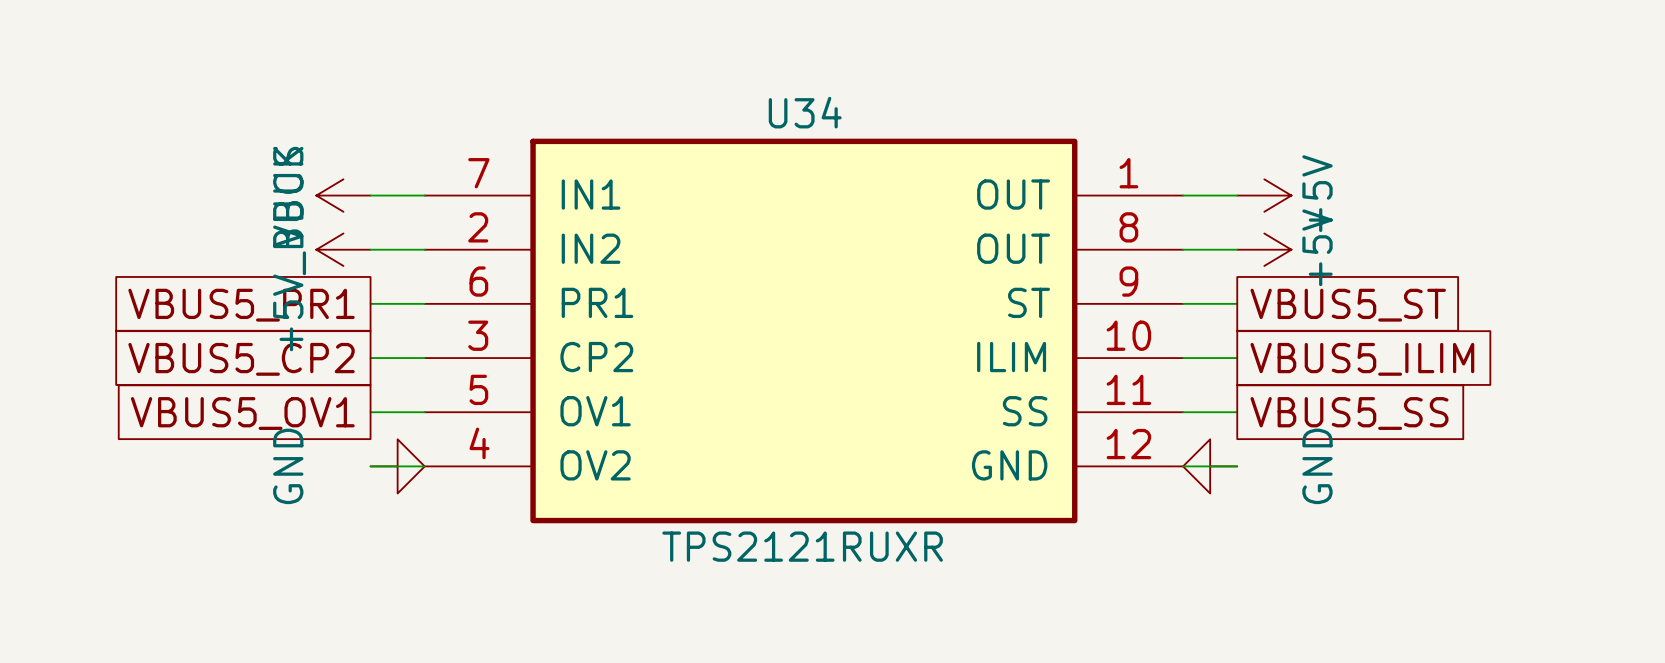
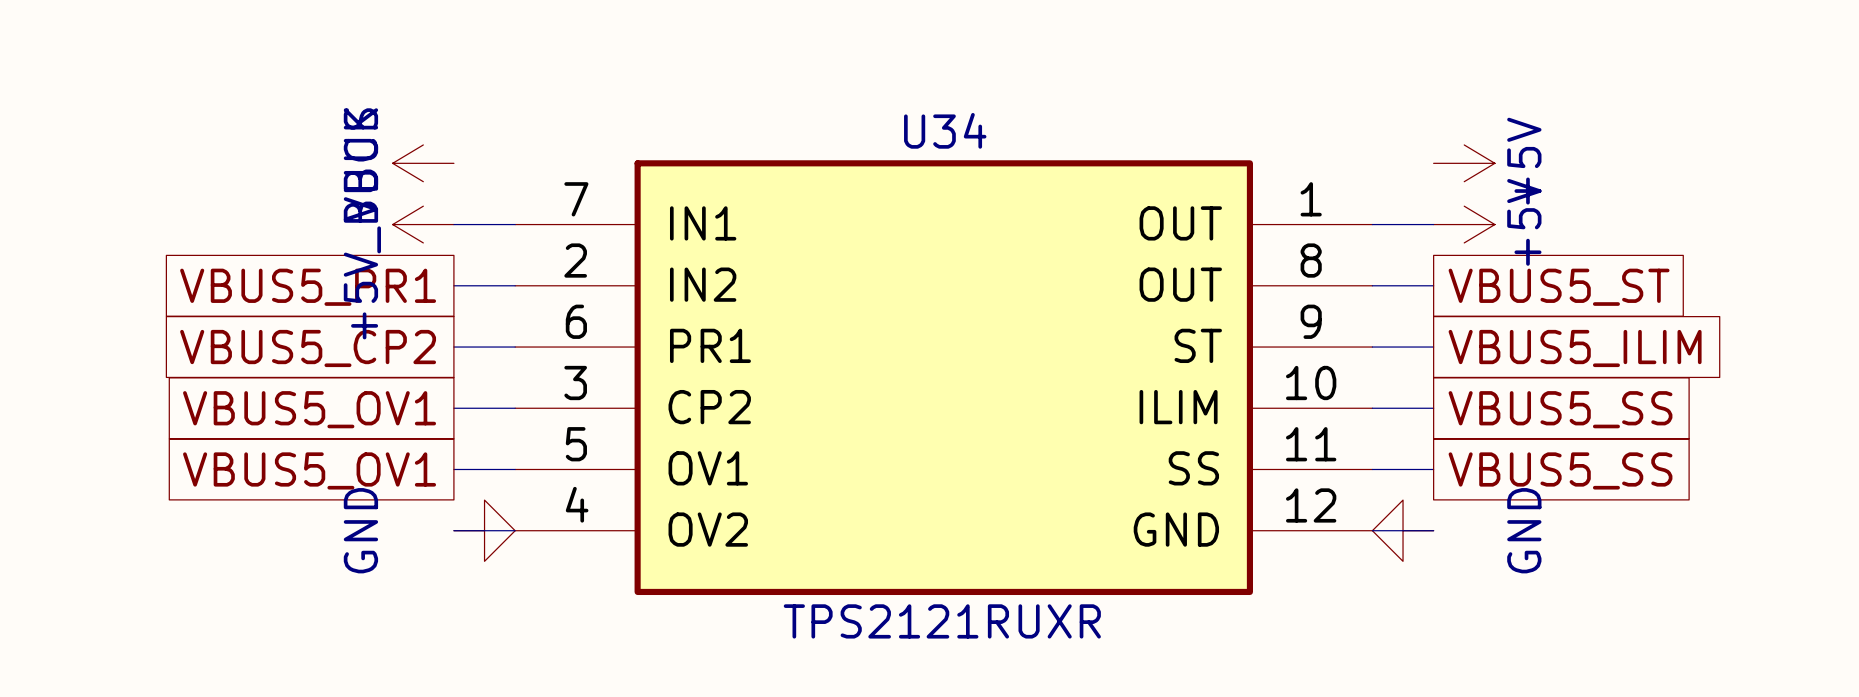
wire: (370, 195) (424, 195) -> (453, 530) (515, 530)
wire: (1183, 195) (1237, 195) -> (1372, 530) (1433, 530)
U34 position: (803, 330) -> (943, 377)
power symbol position: GND (397, 466) -> GND (484, 530)
power symbol position: GND (1210, 466) -> GND (1403, 530)
global label: none -> VBUS5_OV1 (309, 470)
global label: none -> VBUS5_SS (1560, 470)

